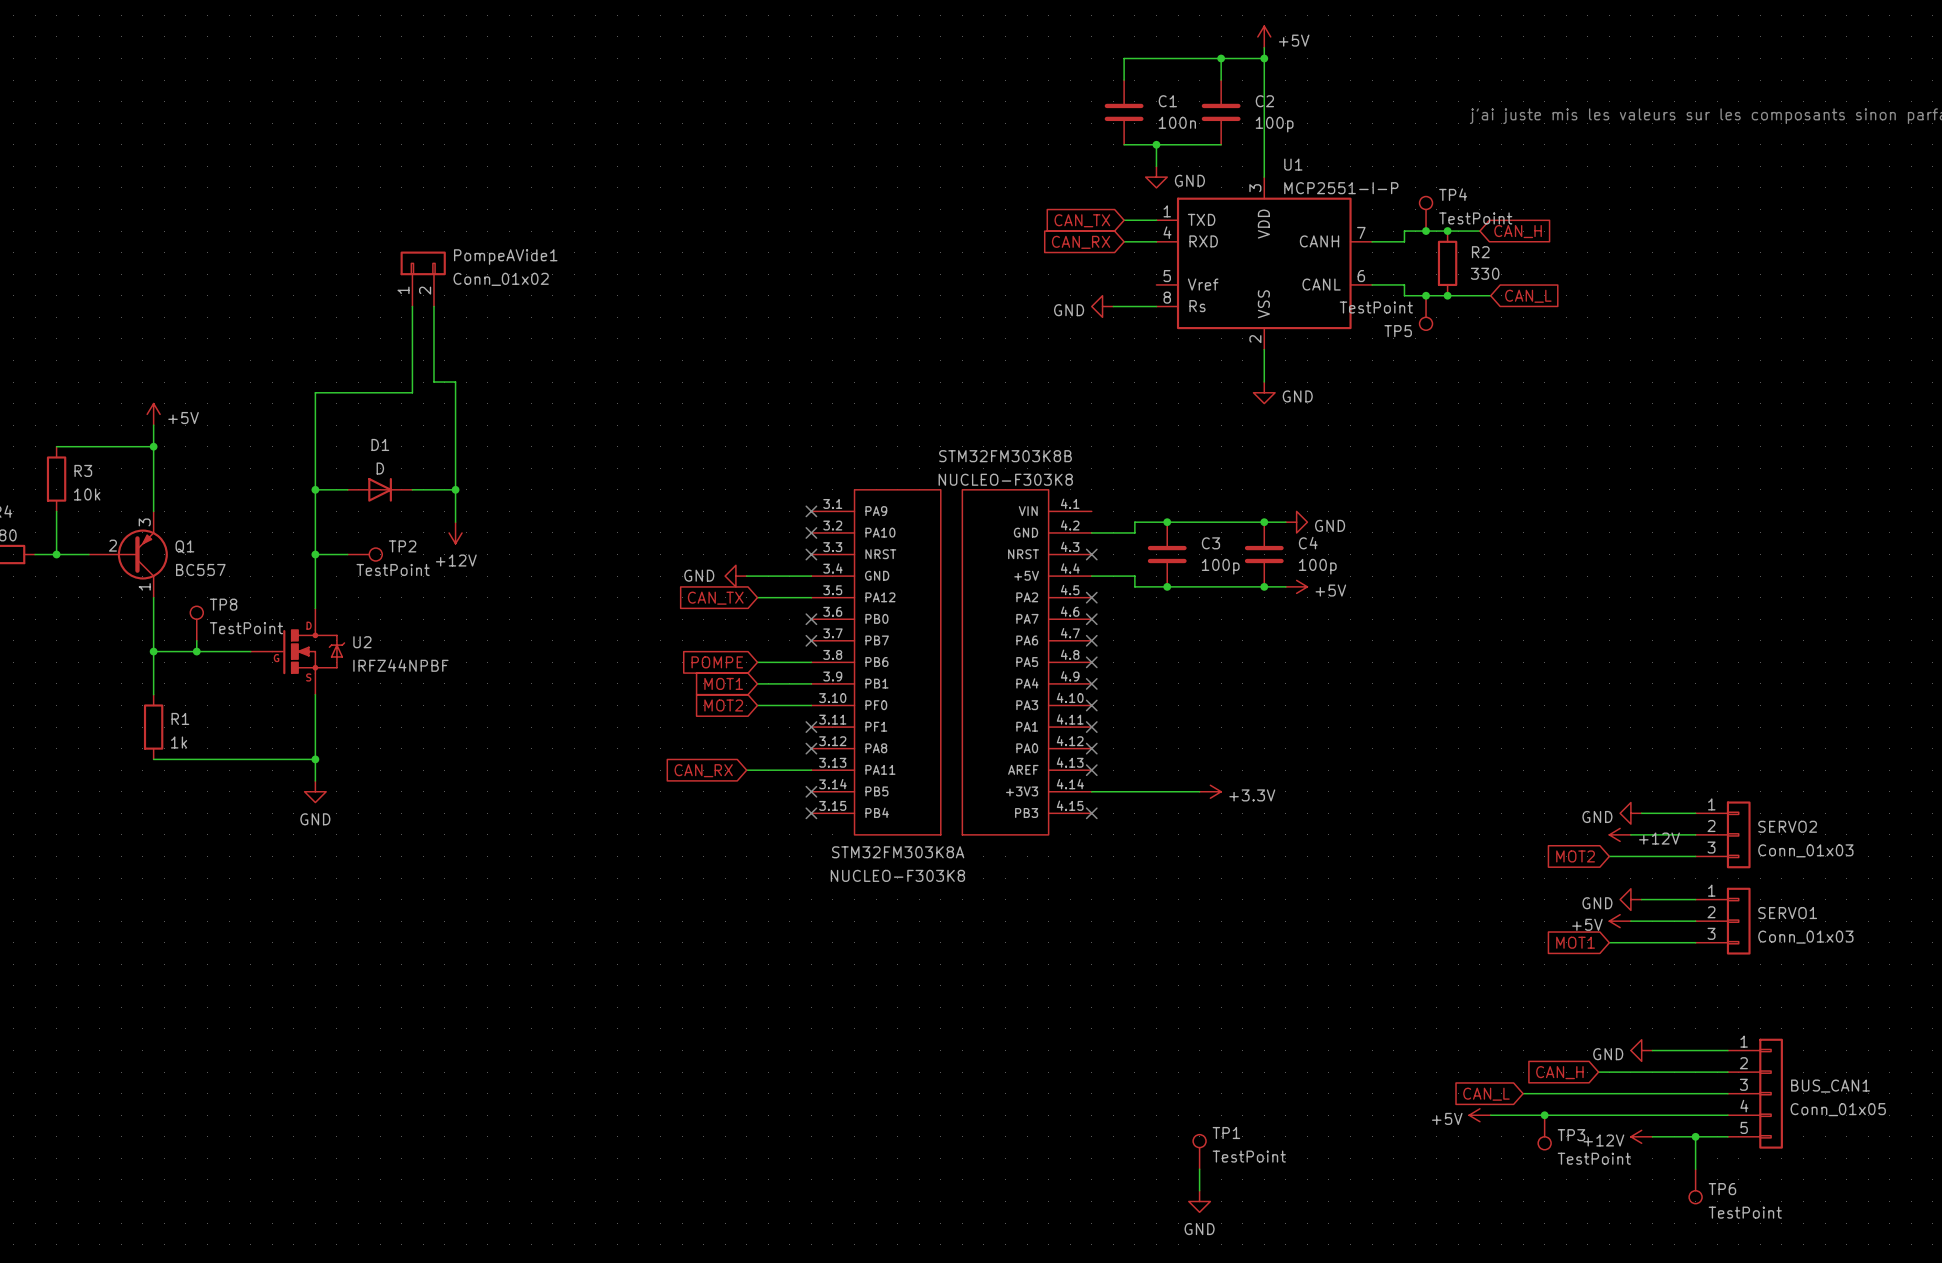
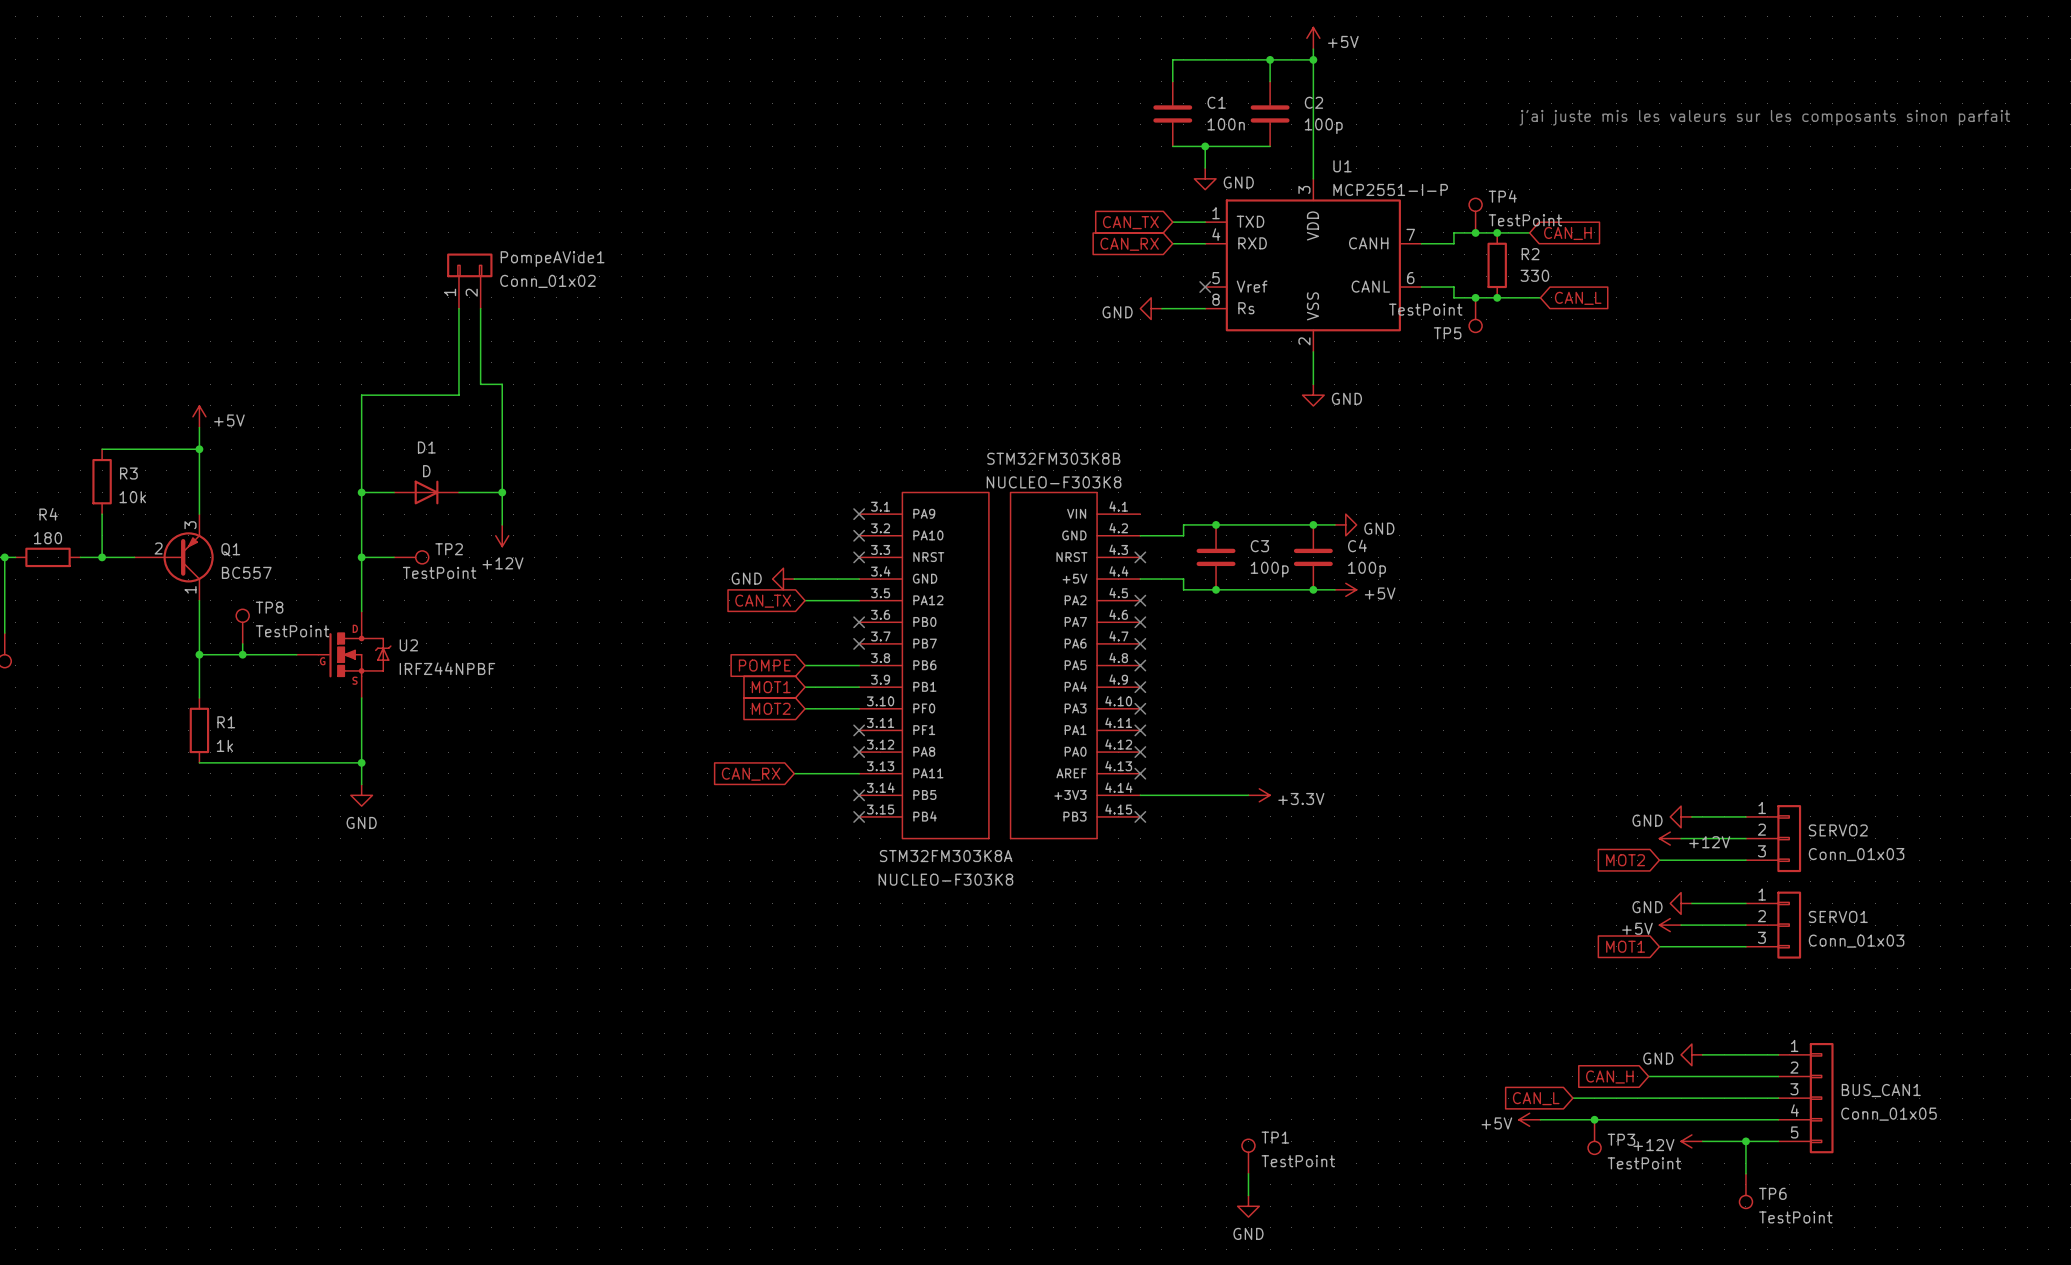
no-connect mark: none -> (1205, 287)

